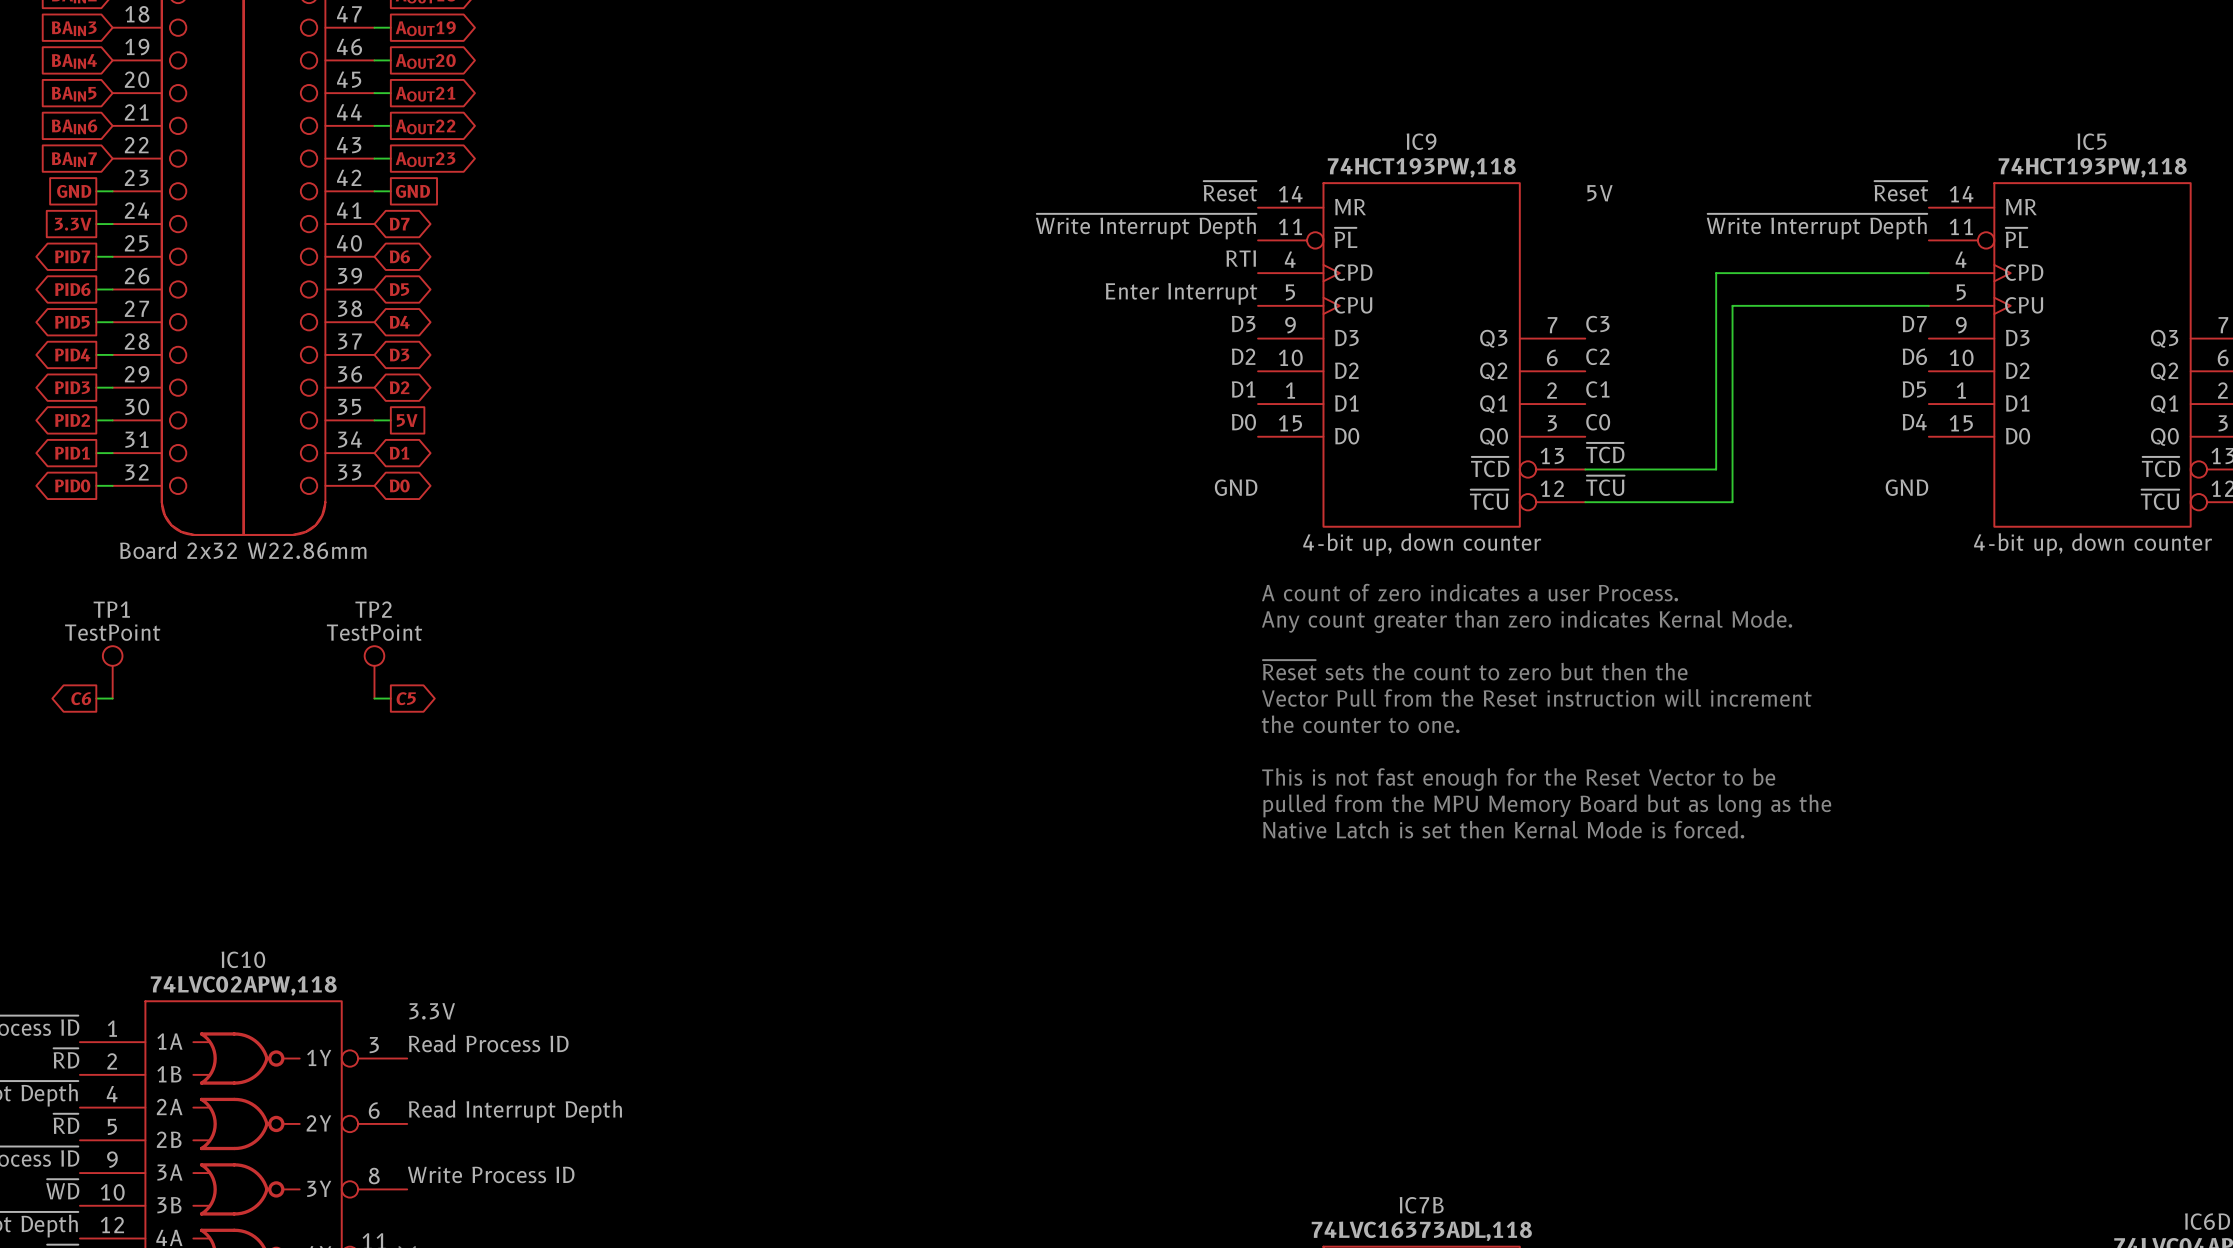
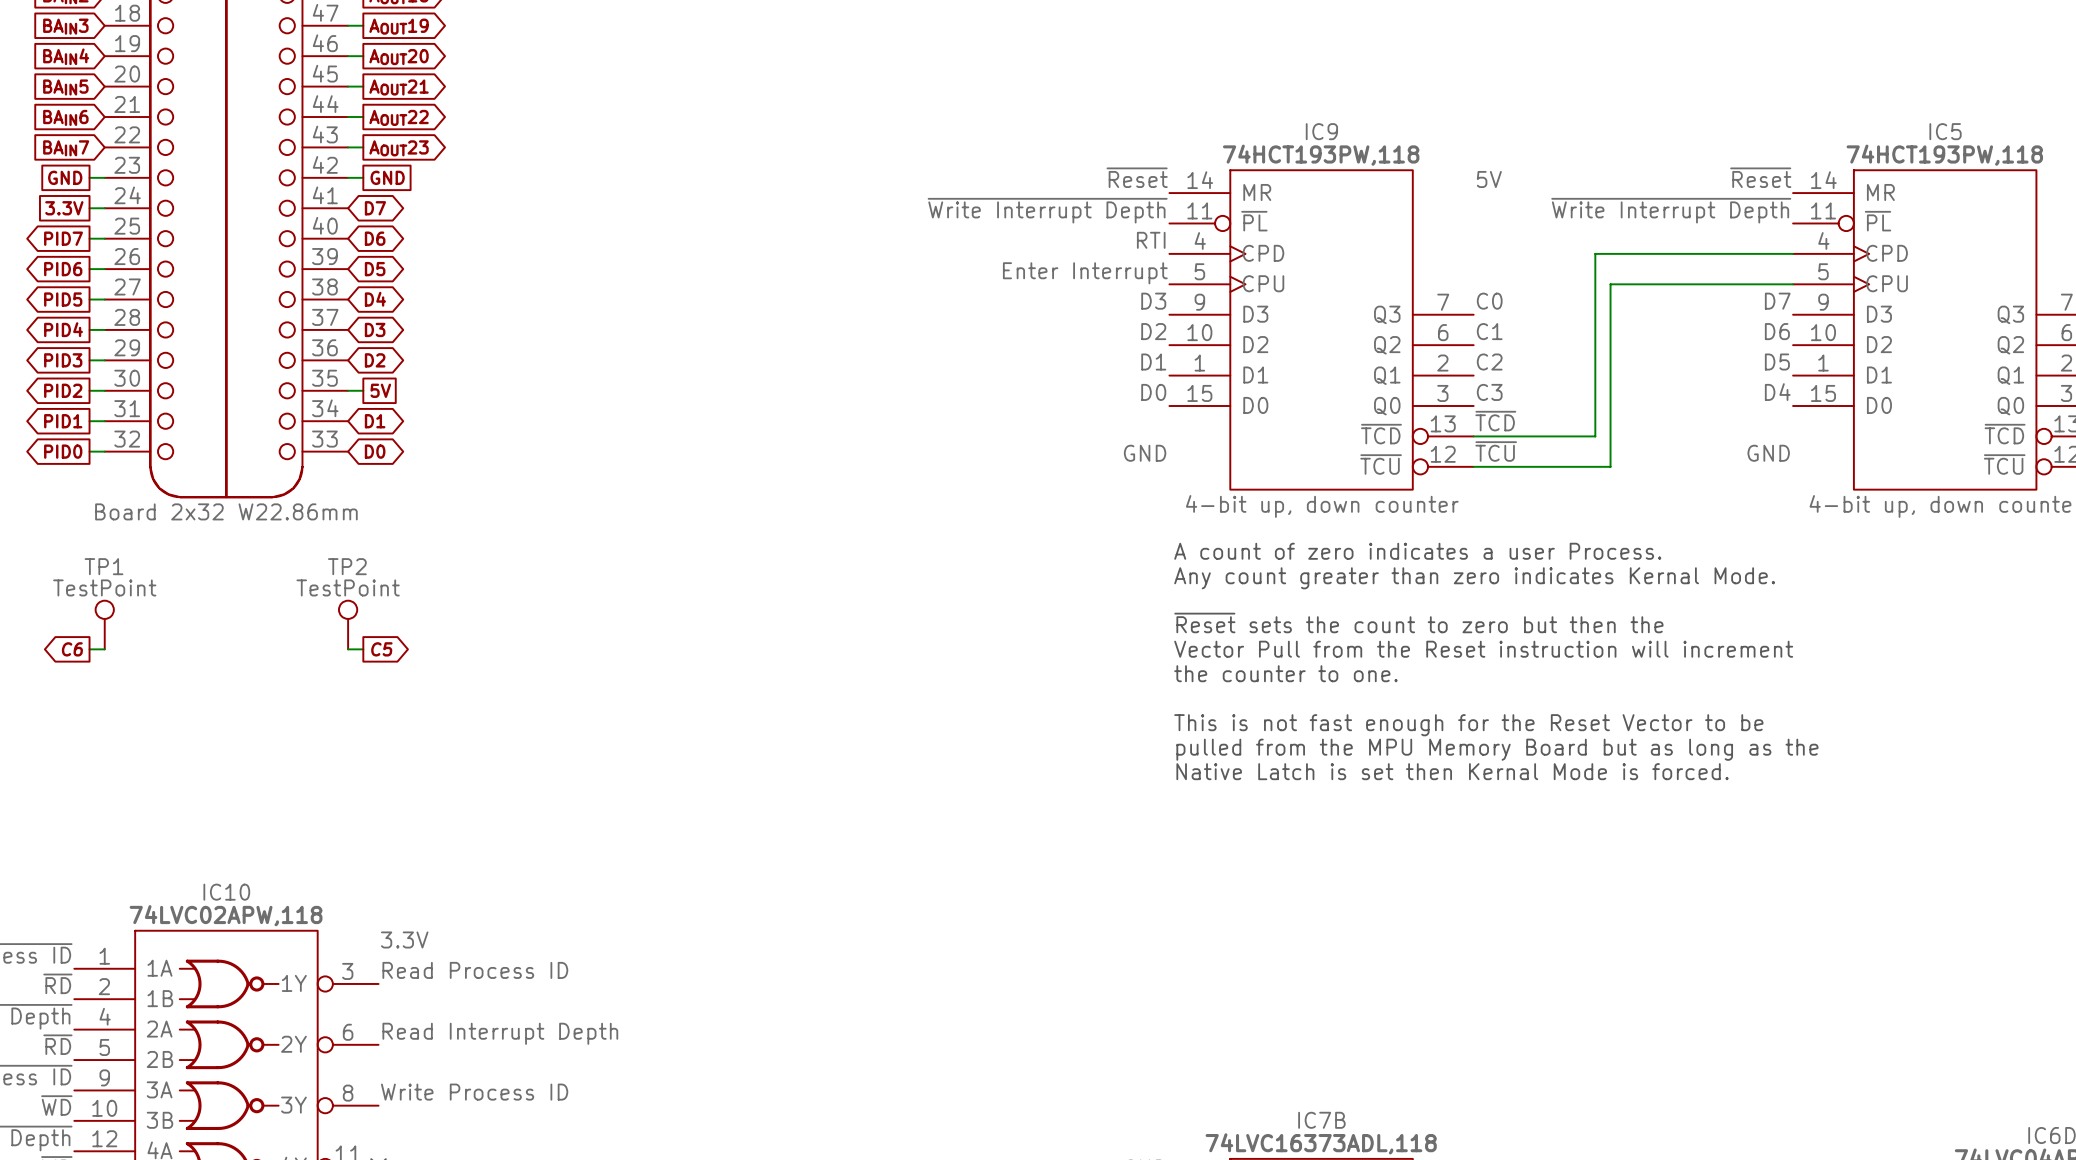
label: C3 (1597, 324) -> C0 (1489, 301)
label: C2 (1597, 356) -> C1 (1489, 331)
label: C1 (1597, 389) -> C2 (1489, 362)
label: C0 (1598, 422) -> C3 (1489, 392)

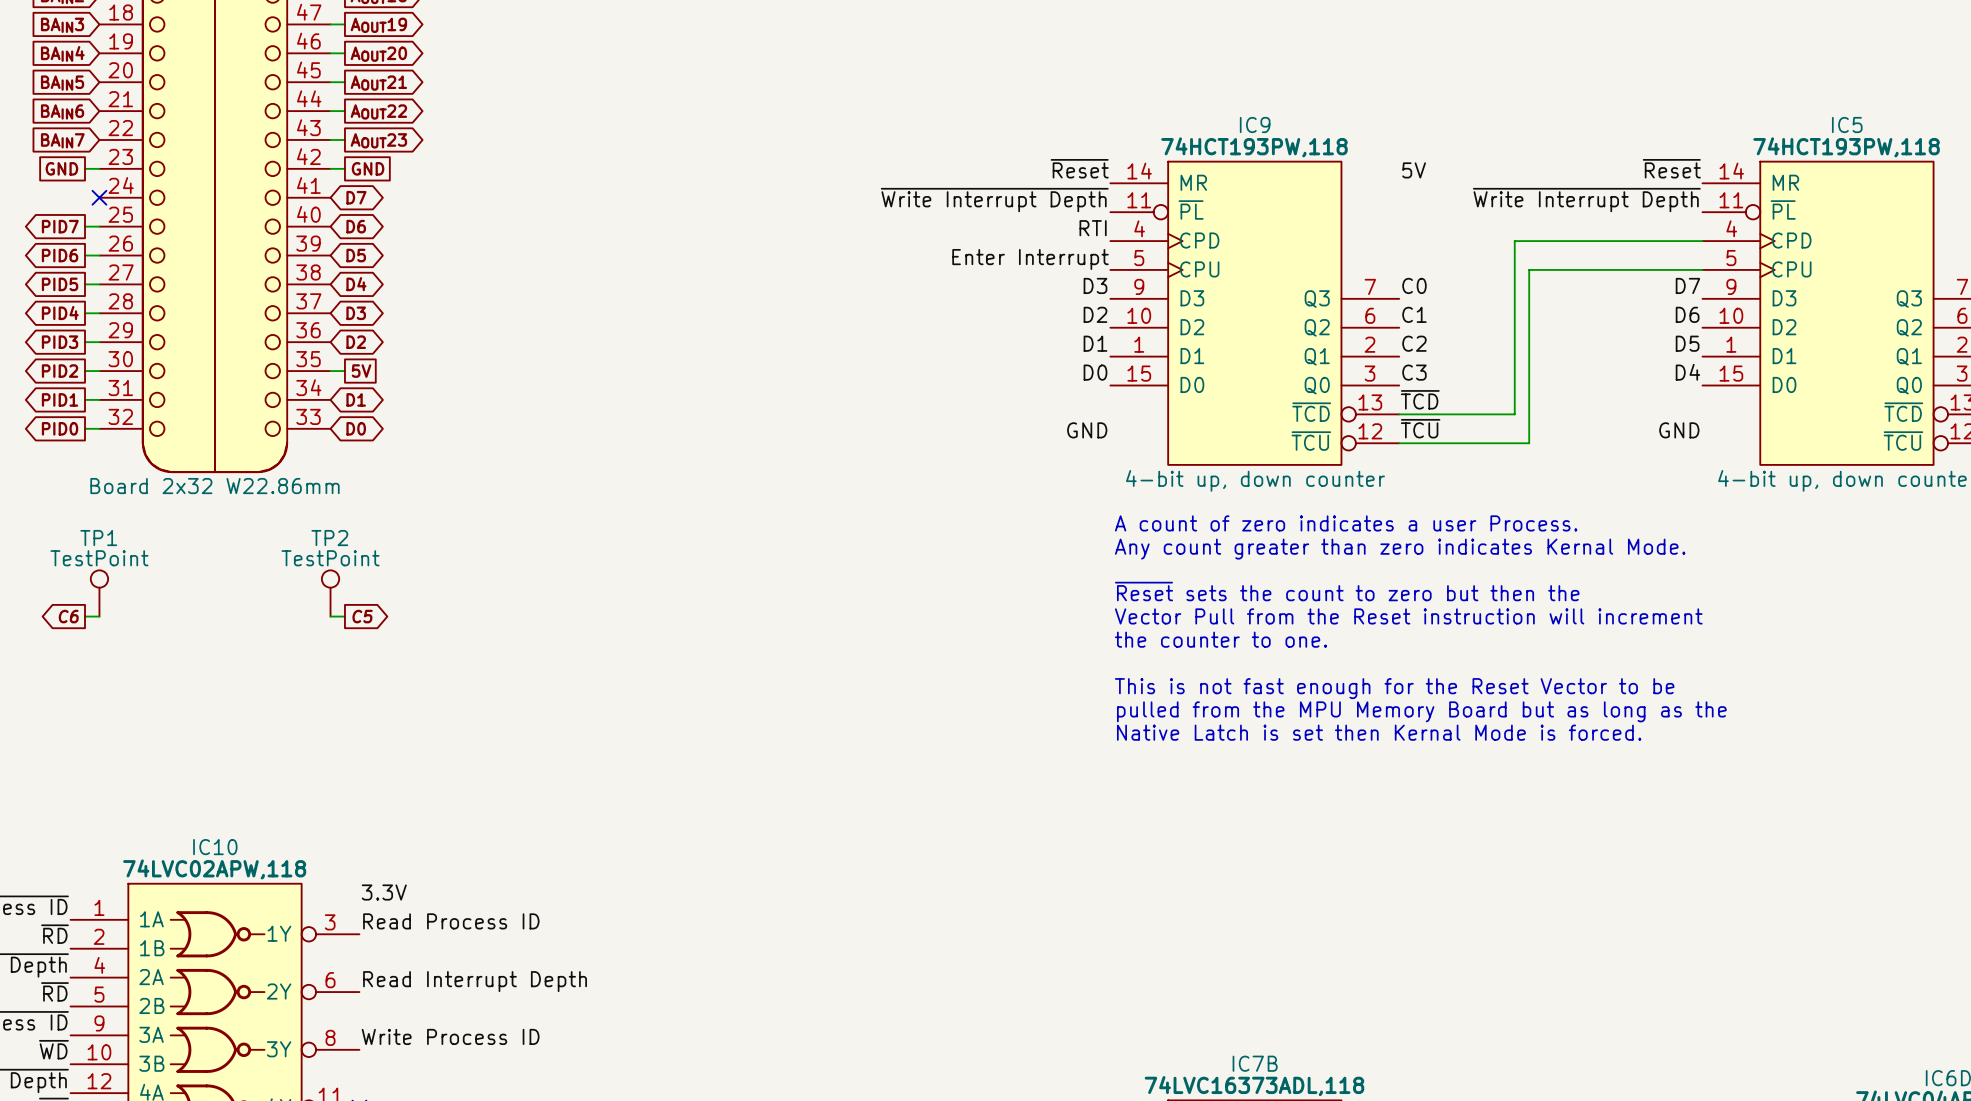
global label: 3.3V (64, 208) -> none
wire: (89, 208) (104, 208) -> none
no-connect mark: none -> (99, 197)

